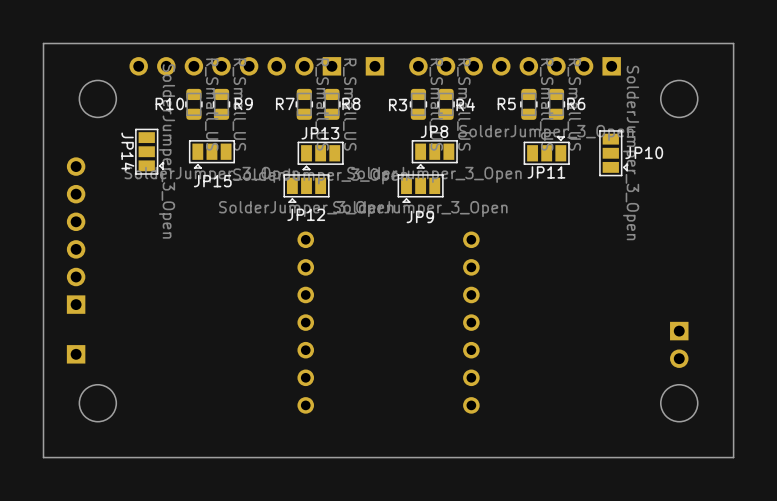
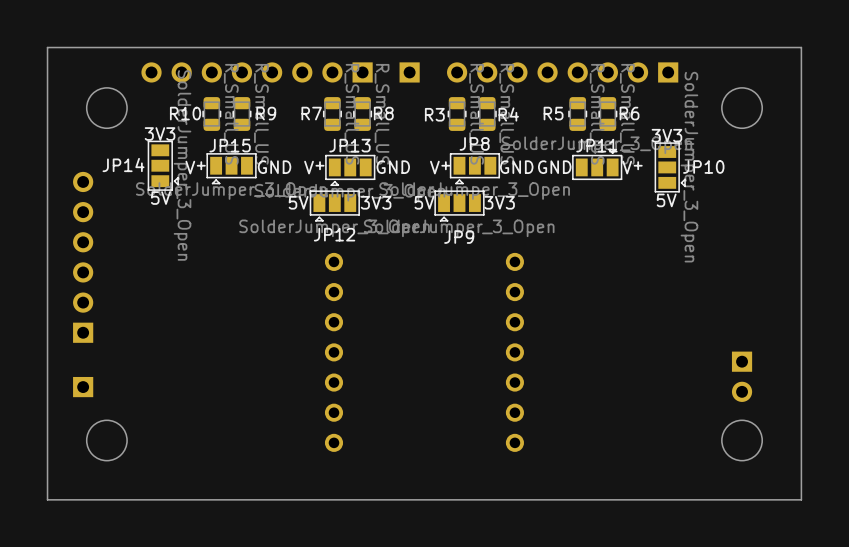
text: none -> 3V3 (160, 134)
text: none -> 3V3 (666, 135)
JP14 name rotation: 0° (127, 151) -> 90° counterclockwise (123, 165)
text: none -> V+ (195, 167)
text: none -> GND (274, 167)
text: none -> V+ (314, 167)
text: none -> GND (393, 167)
text: none -> V+ (440, 167)
text: none -> GND (516, 167)
text: none -> GND (554, 167)
text: none -> V+ (632, 167)
JP11 name position: JP11 (546, 172) -> JP11 (596, 145)
text: none -> 5V (160, 198)
JP15 name position: JP15 (212, 181) -> JP15 (230, 145)
text: none -> 5V (666, 200)
text: none -> 5V (298, 202)
text: none -> 3V3 (376, 202)
text: none -> 5V (424, 202)
text: none -> 3V3 (499, 202)

